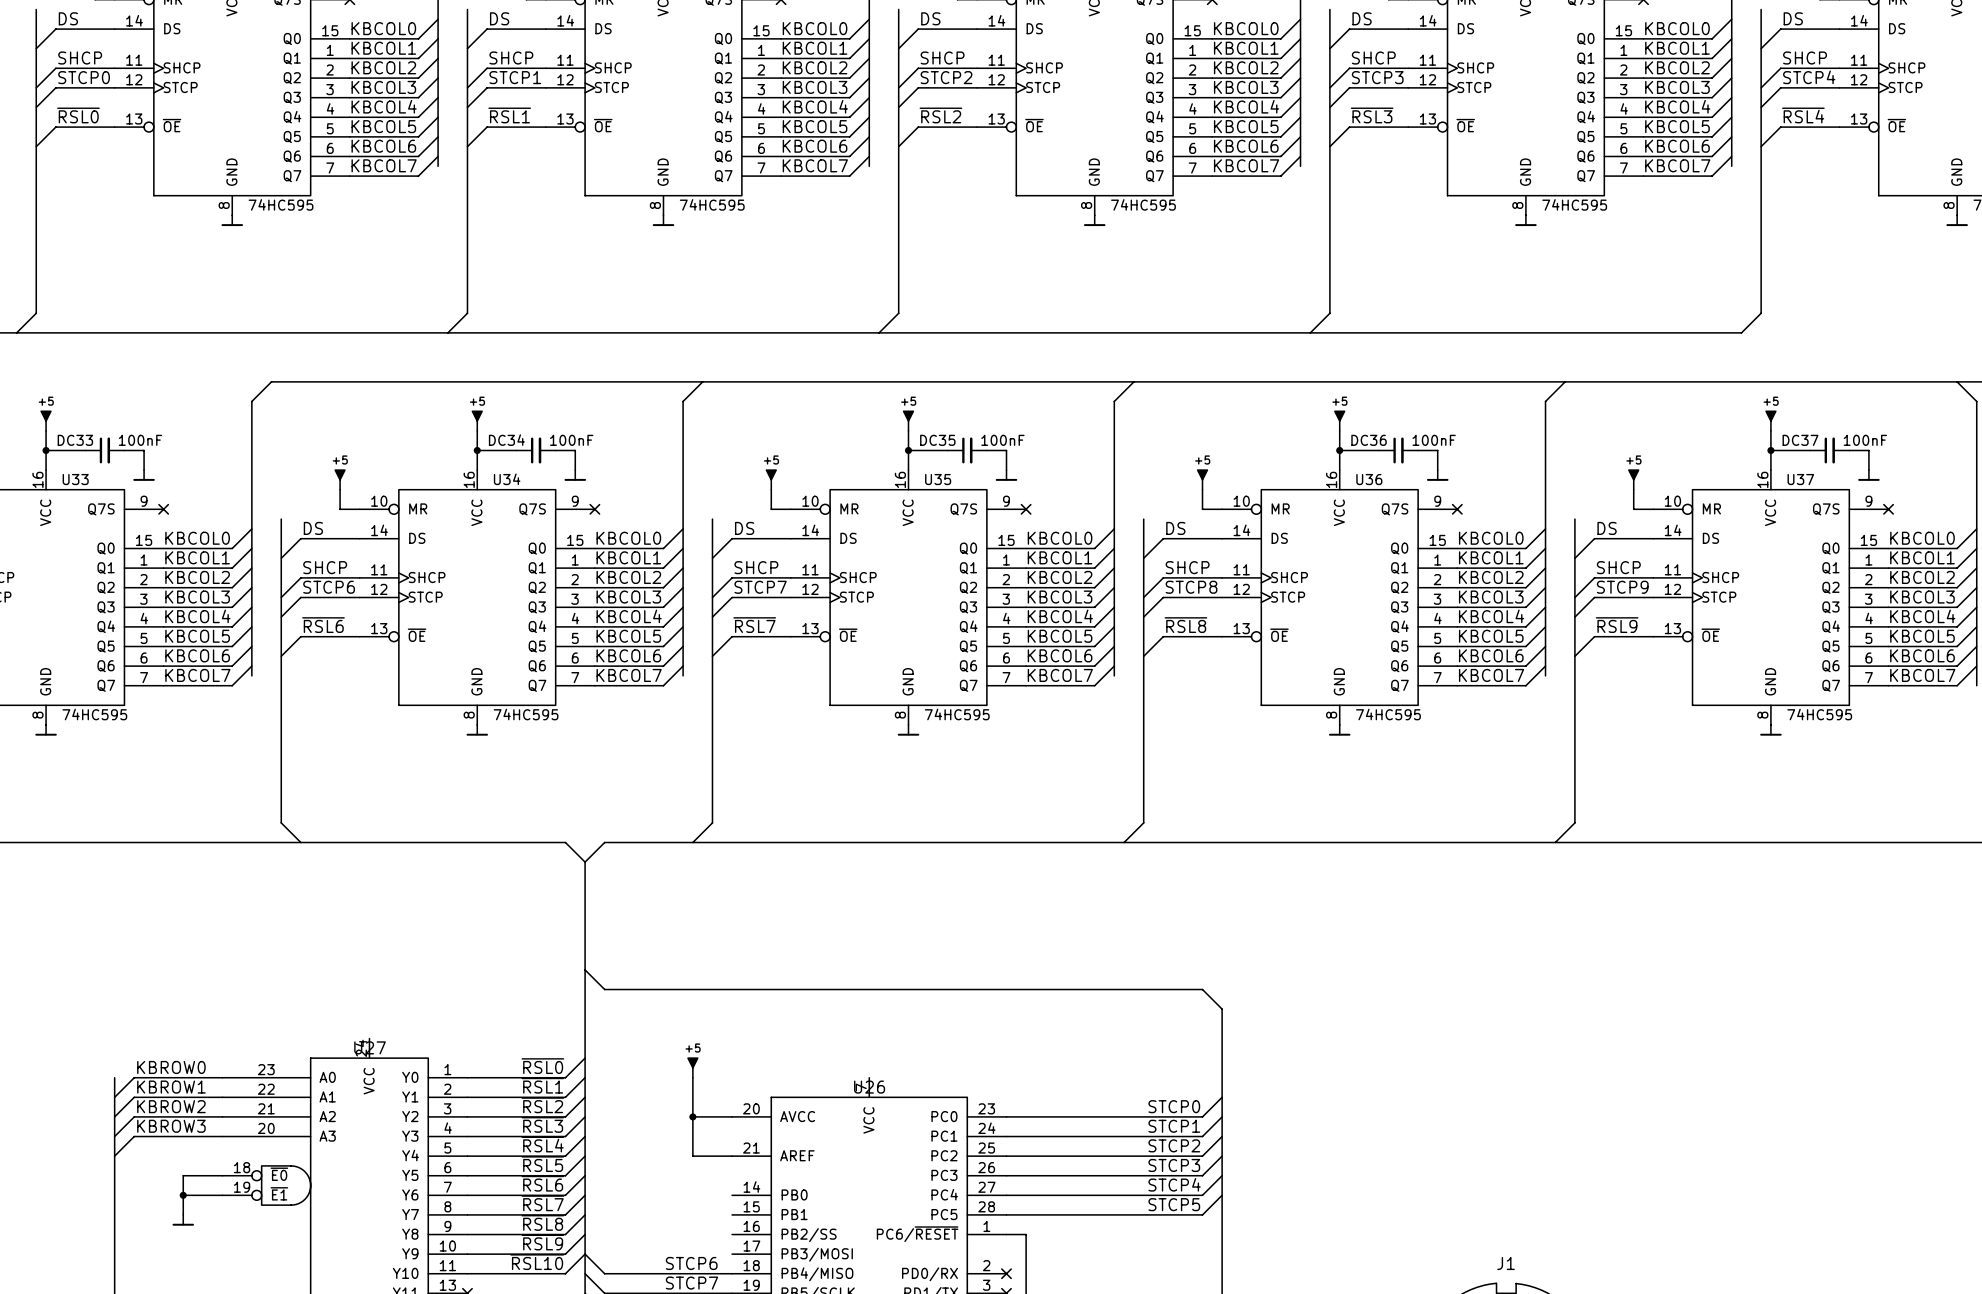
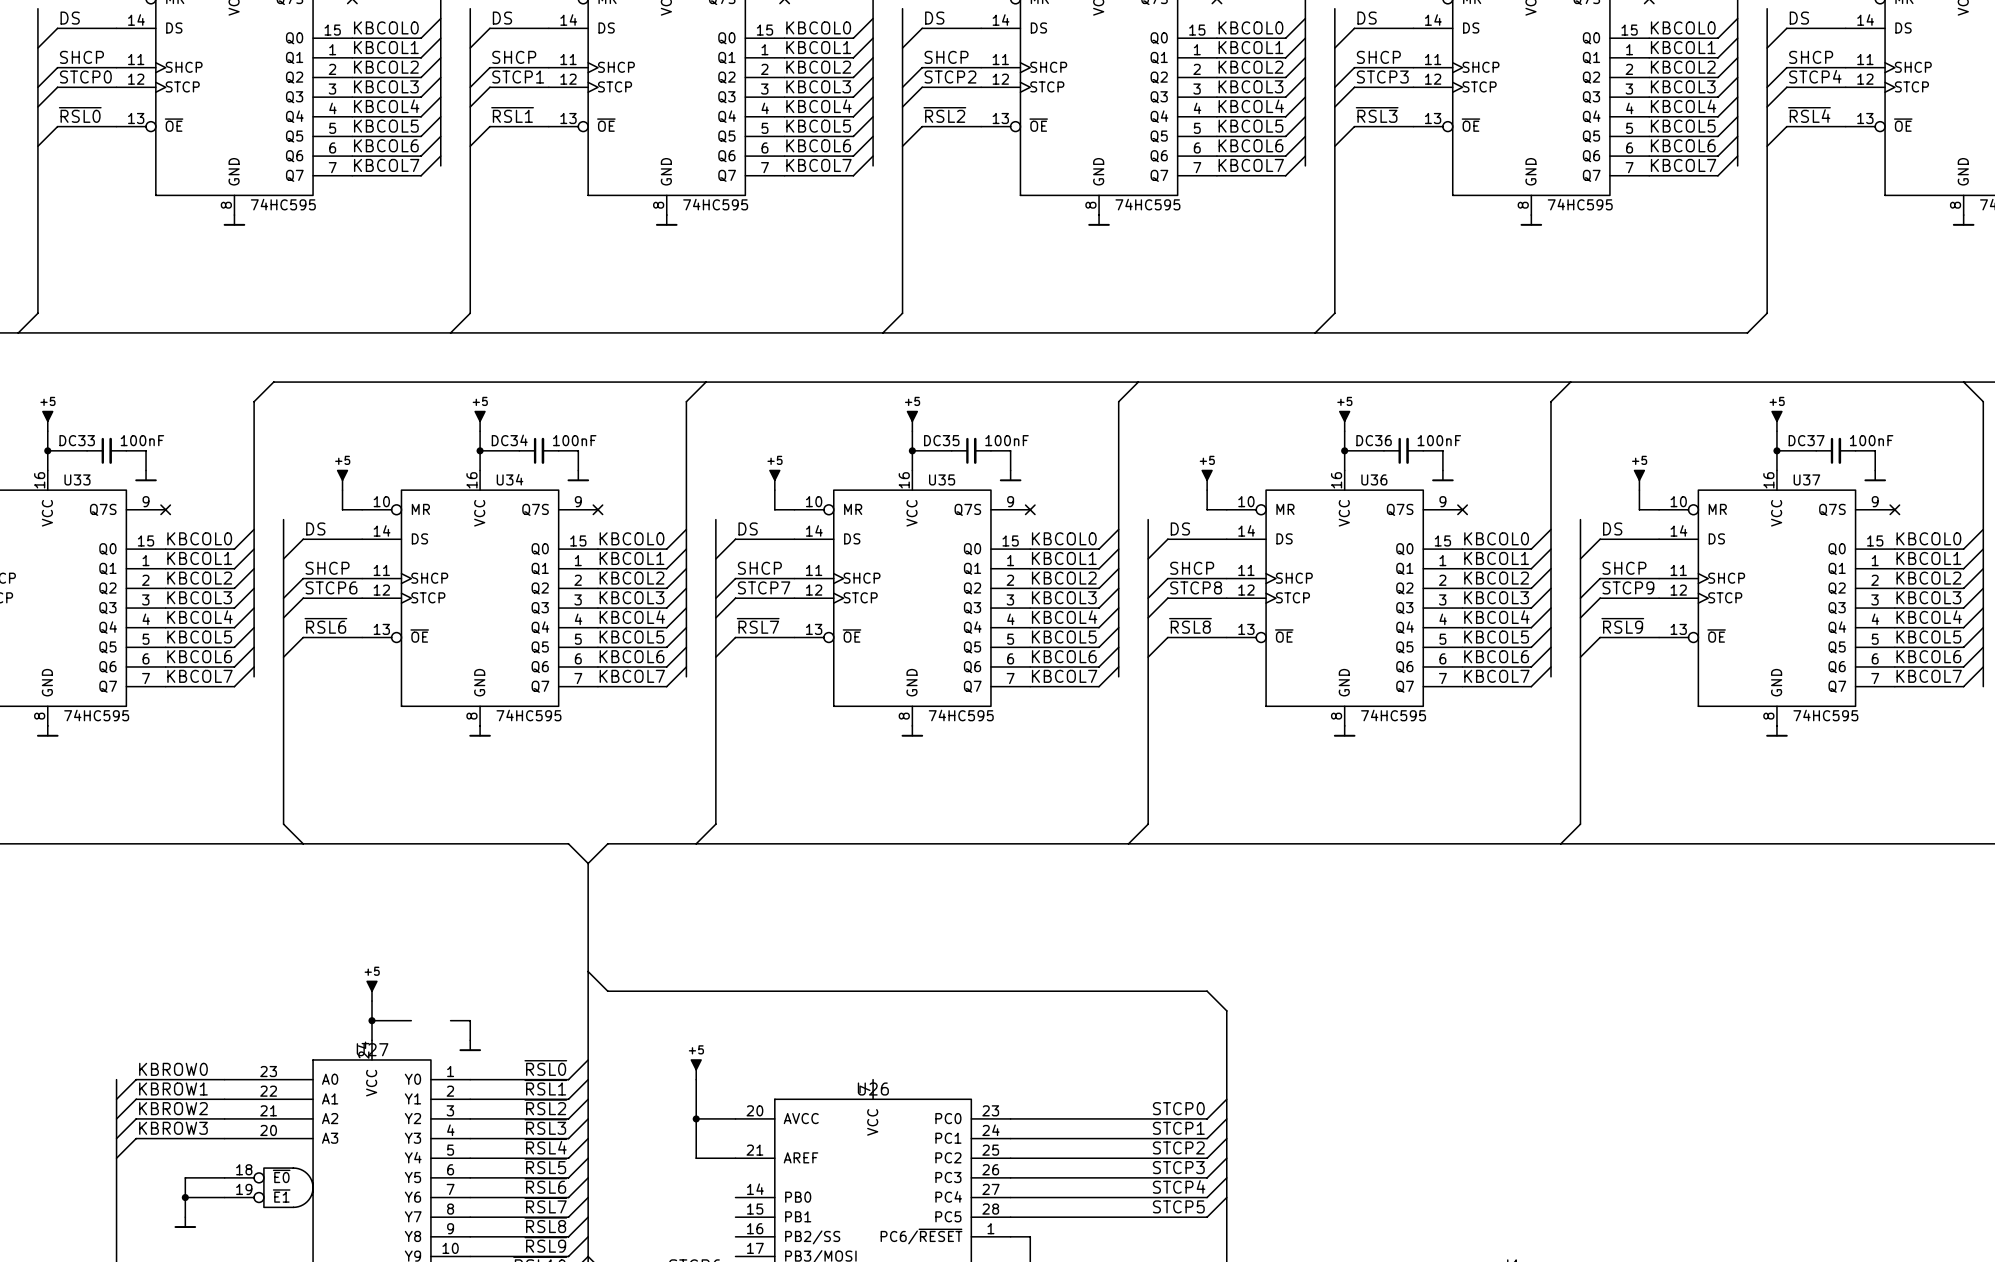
power symbol: none -> (371, 991)
wire: none -> (371, 1001) (371, 1040)
wire: none -> (371, 1020) (411, 1020)
junction: none -> (371, 1020)
wire: none -> (450, 1020) (470, 1020) (470, 1040)
power symbol: none -> (470, 1045)

